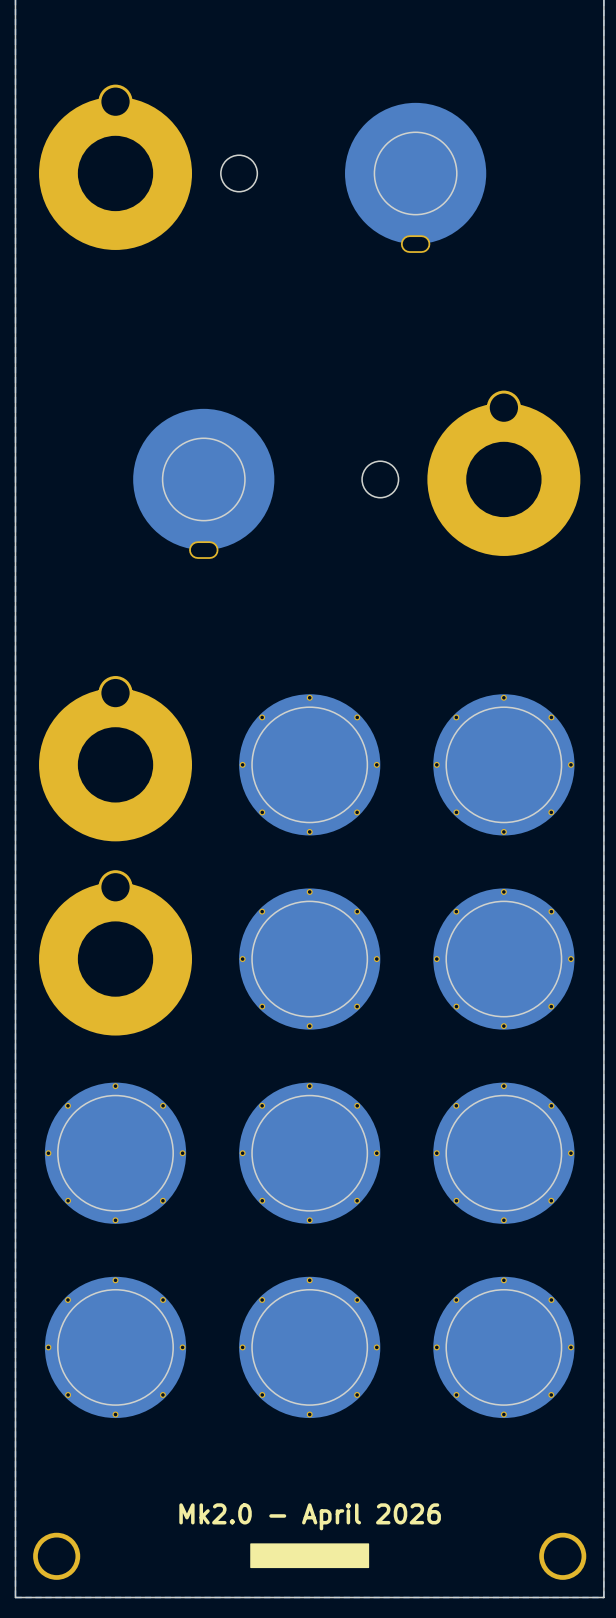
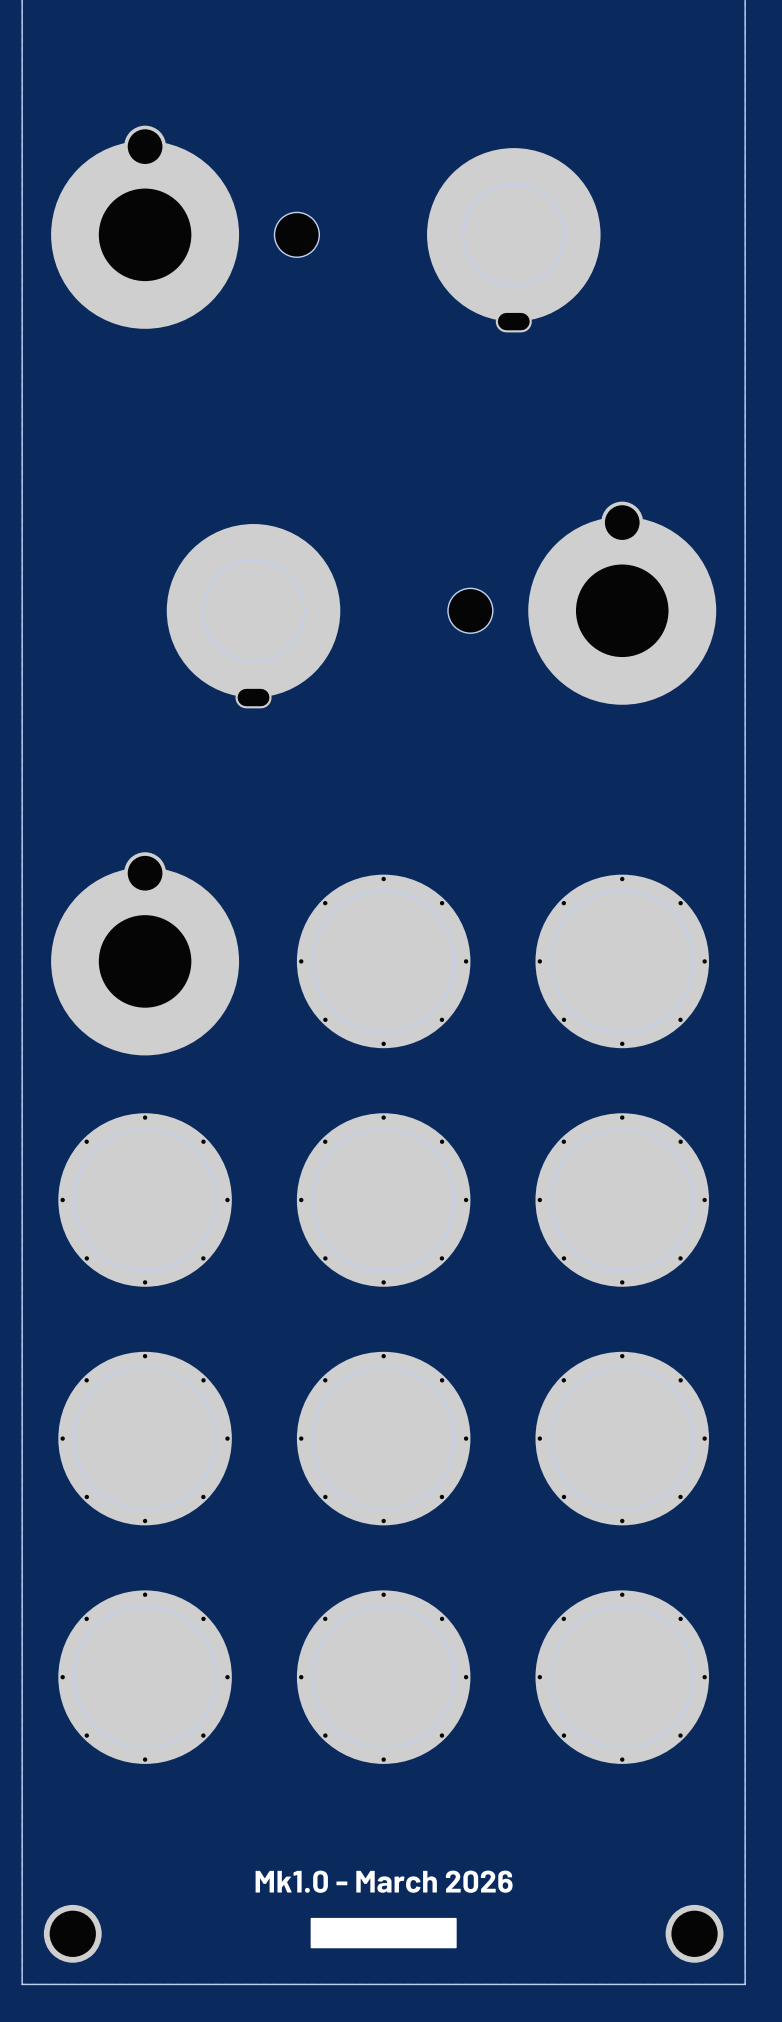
part footprint: [39, 870, 193, 1036] -> [58, 1113, 232, 1287]
text: Mk2.0 - April 2026 (310, 1516) -> Mk1.0 - March 2026 (384, 1881)

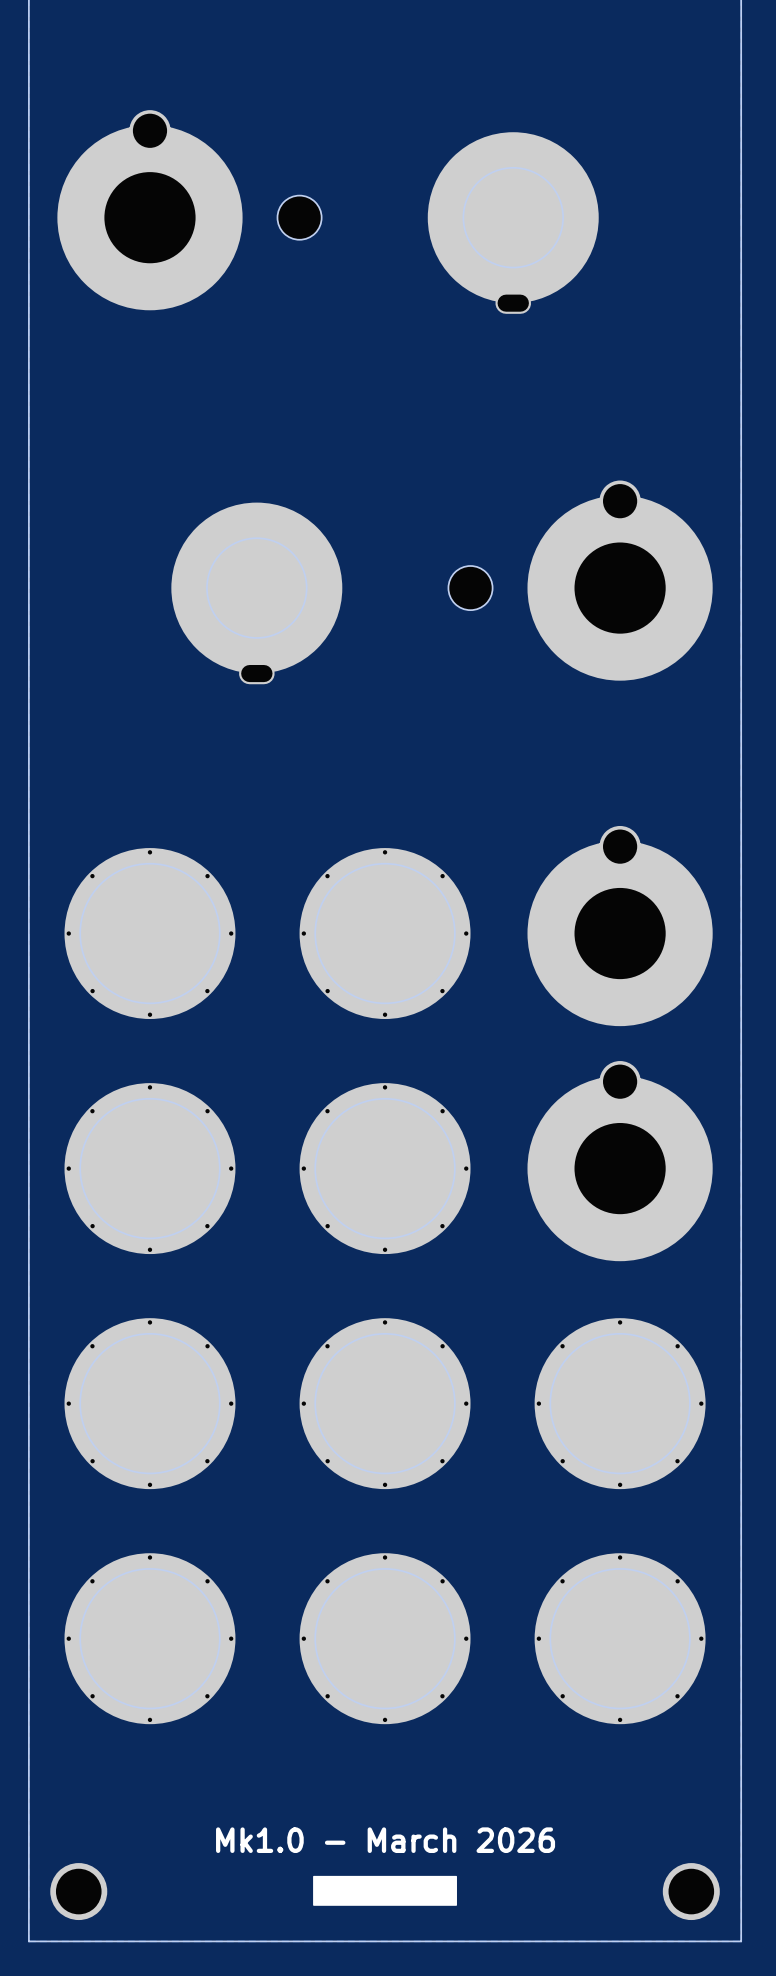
part footprint: [51, 852, 240, 1056] -> [64, 848, 236, 1020]
part footprint: [535, 874, 710, 1049] -> [527, 825, 713, 1027]
part footprint: [535, 1113, 710, 1287] -> [527, 1061, 713, 1262]

